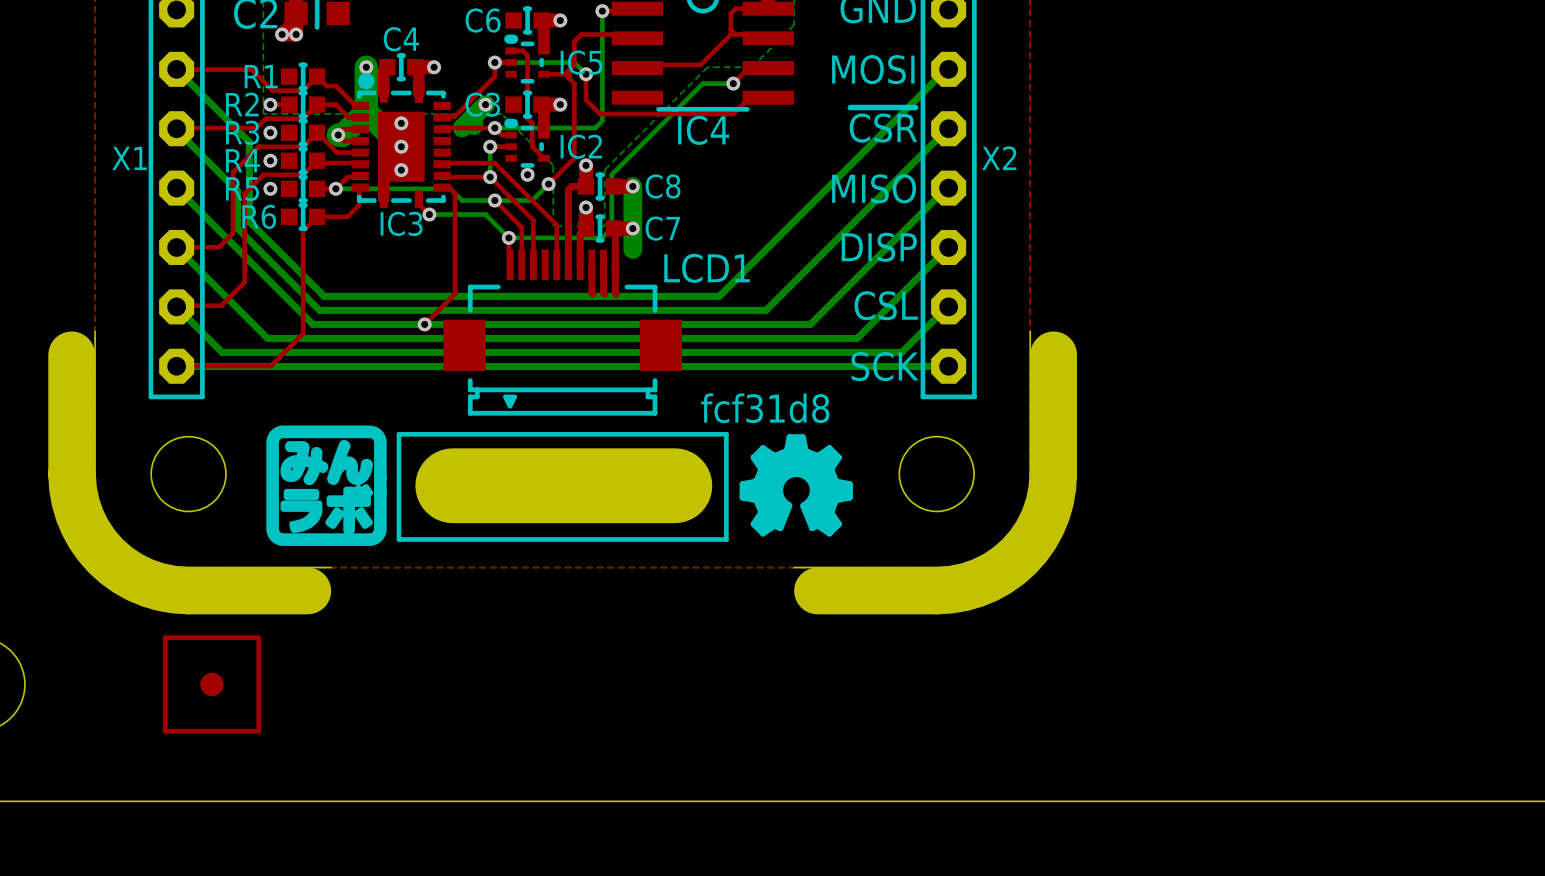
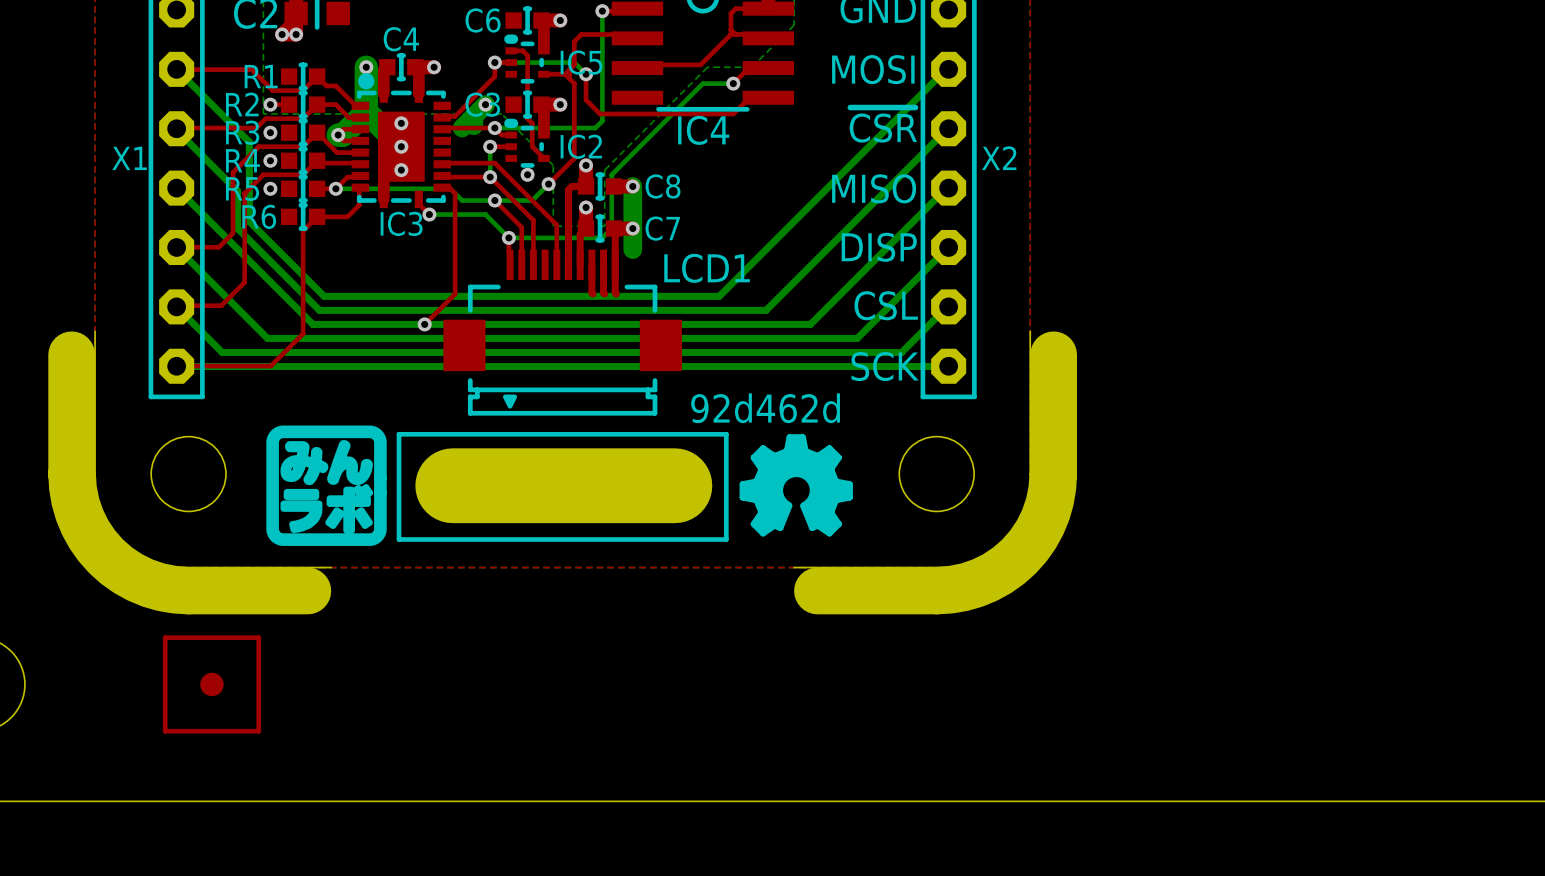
drawing shape: [701, 393, 830, 424] -> [691, 393, 840, 424]

